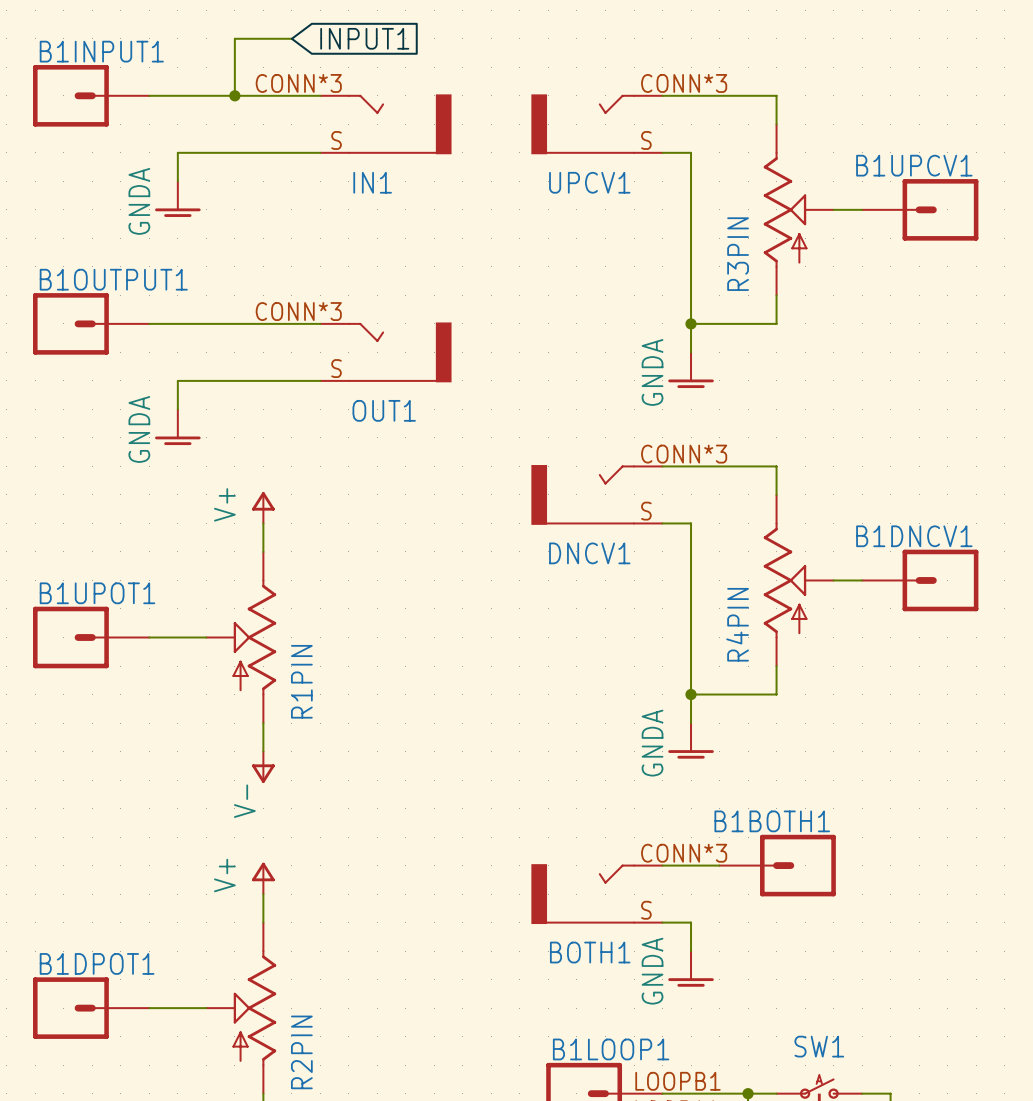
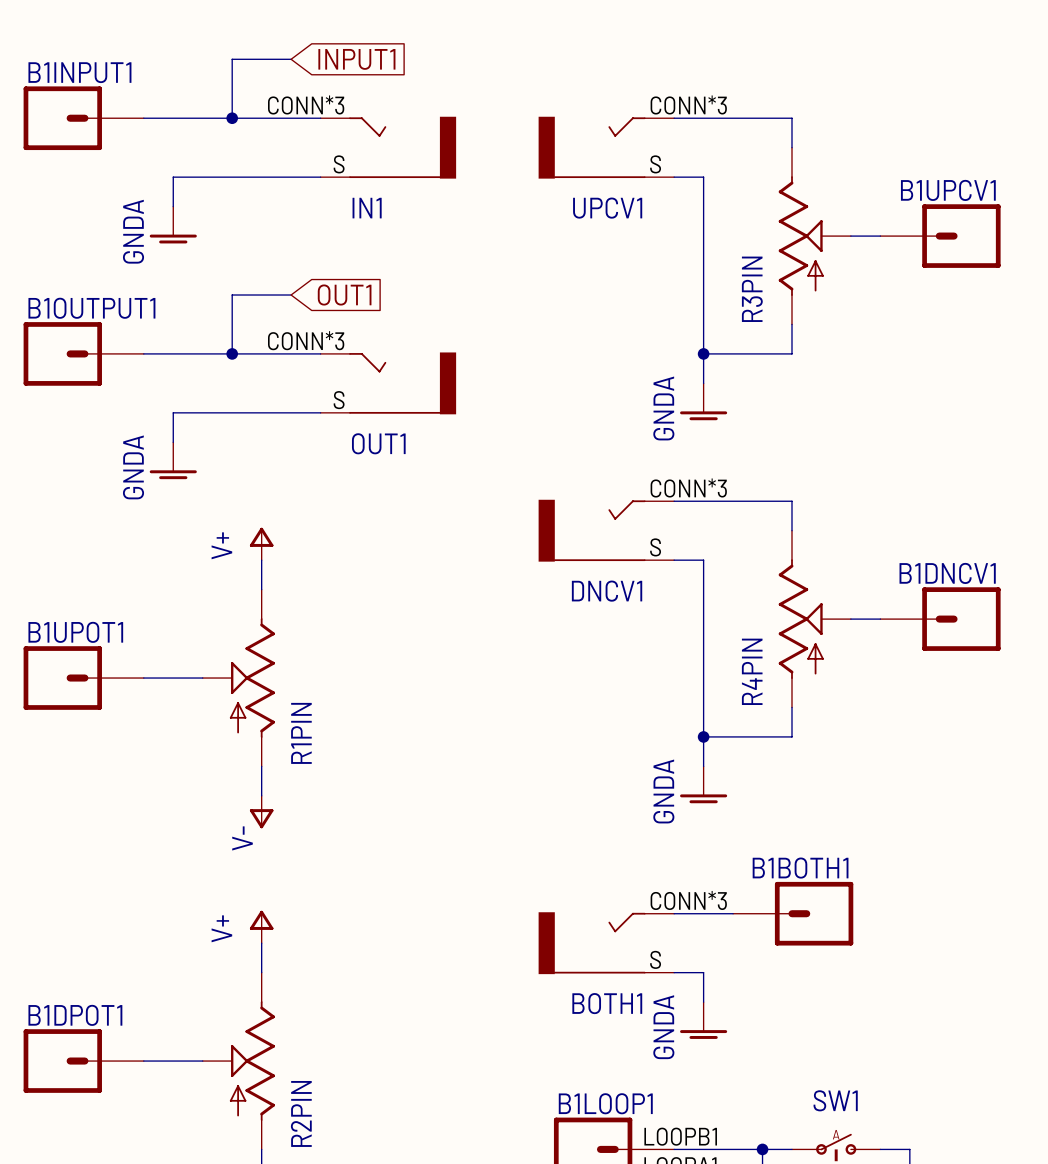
wire: none -> (291, 295) (232, 295) (232, 353)
global label: none -> OUT1 (344, 295)
junction: none -> (232, 353)

